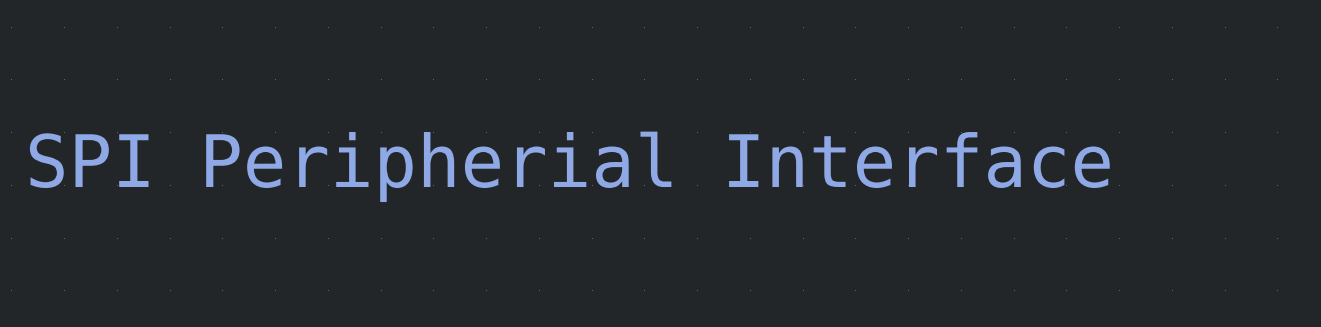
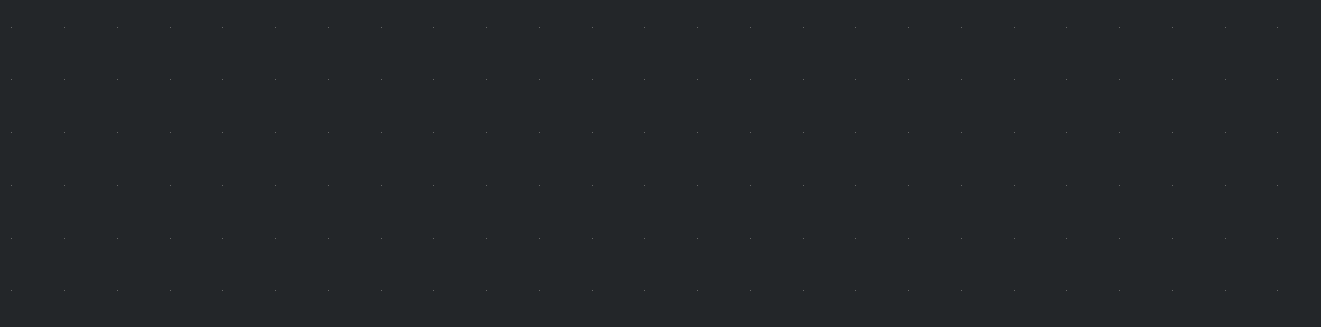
text: SPI Peripherial Interface (569, 166) -> none

